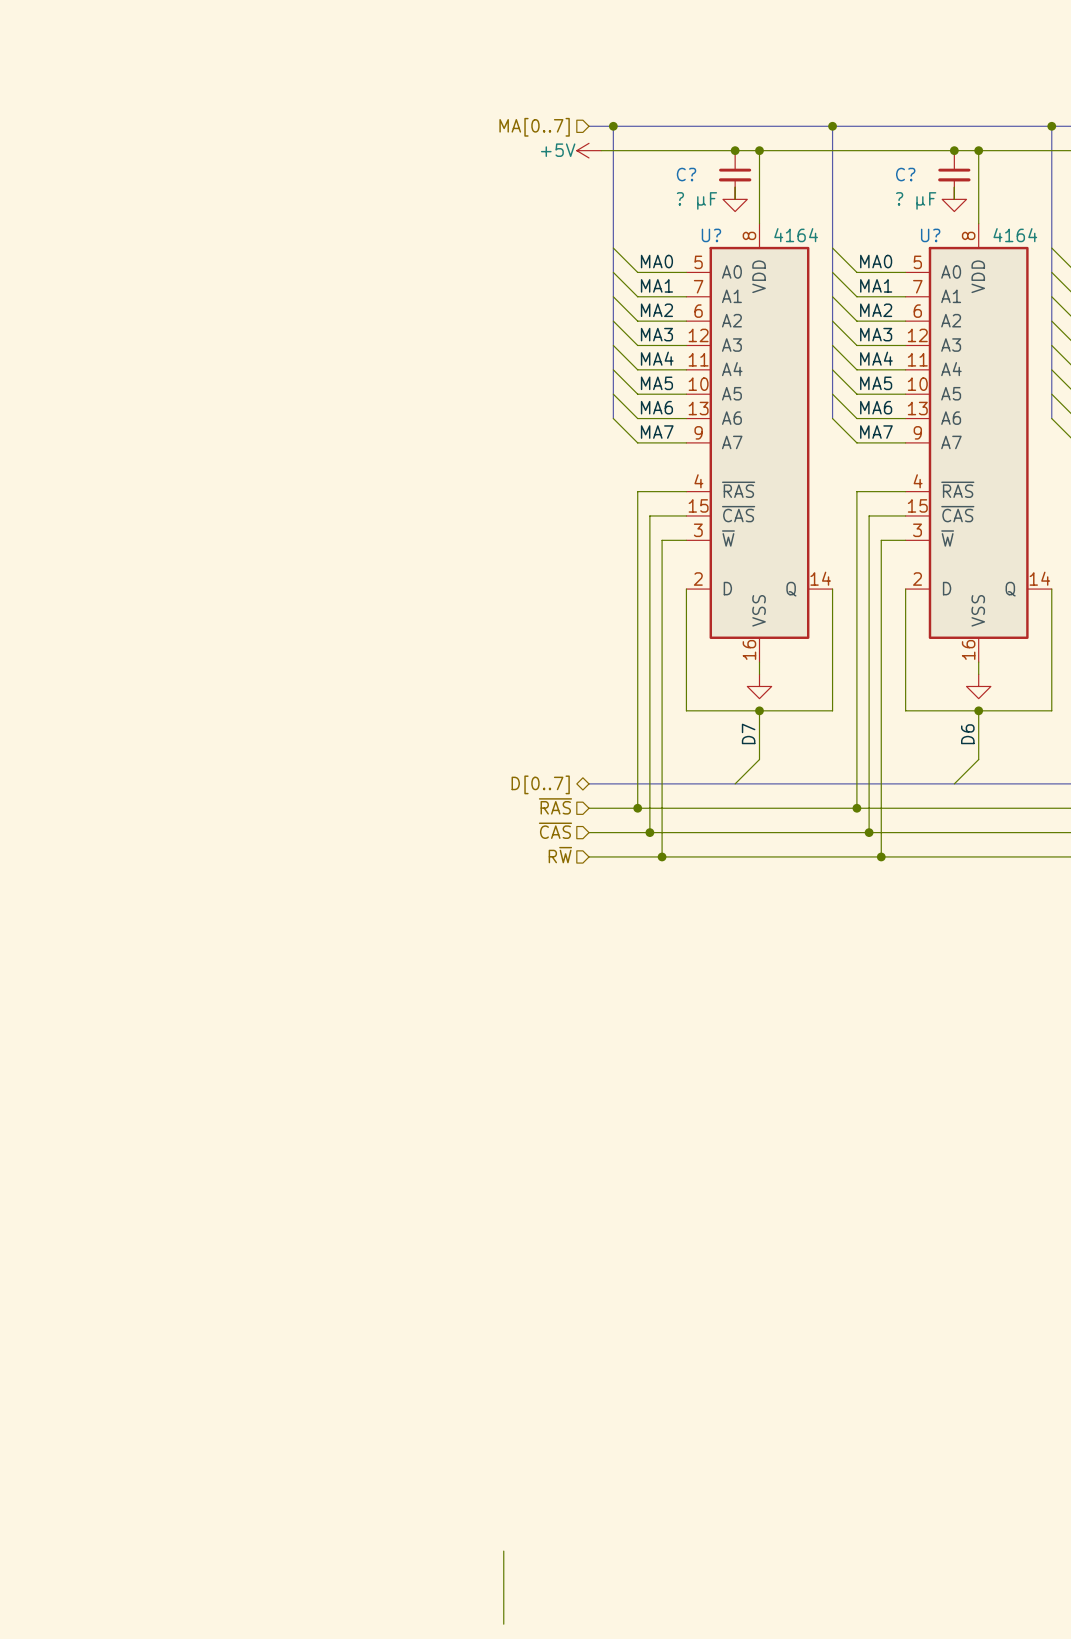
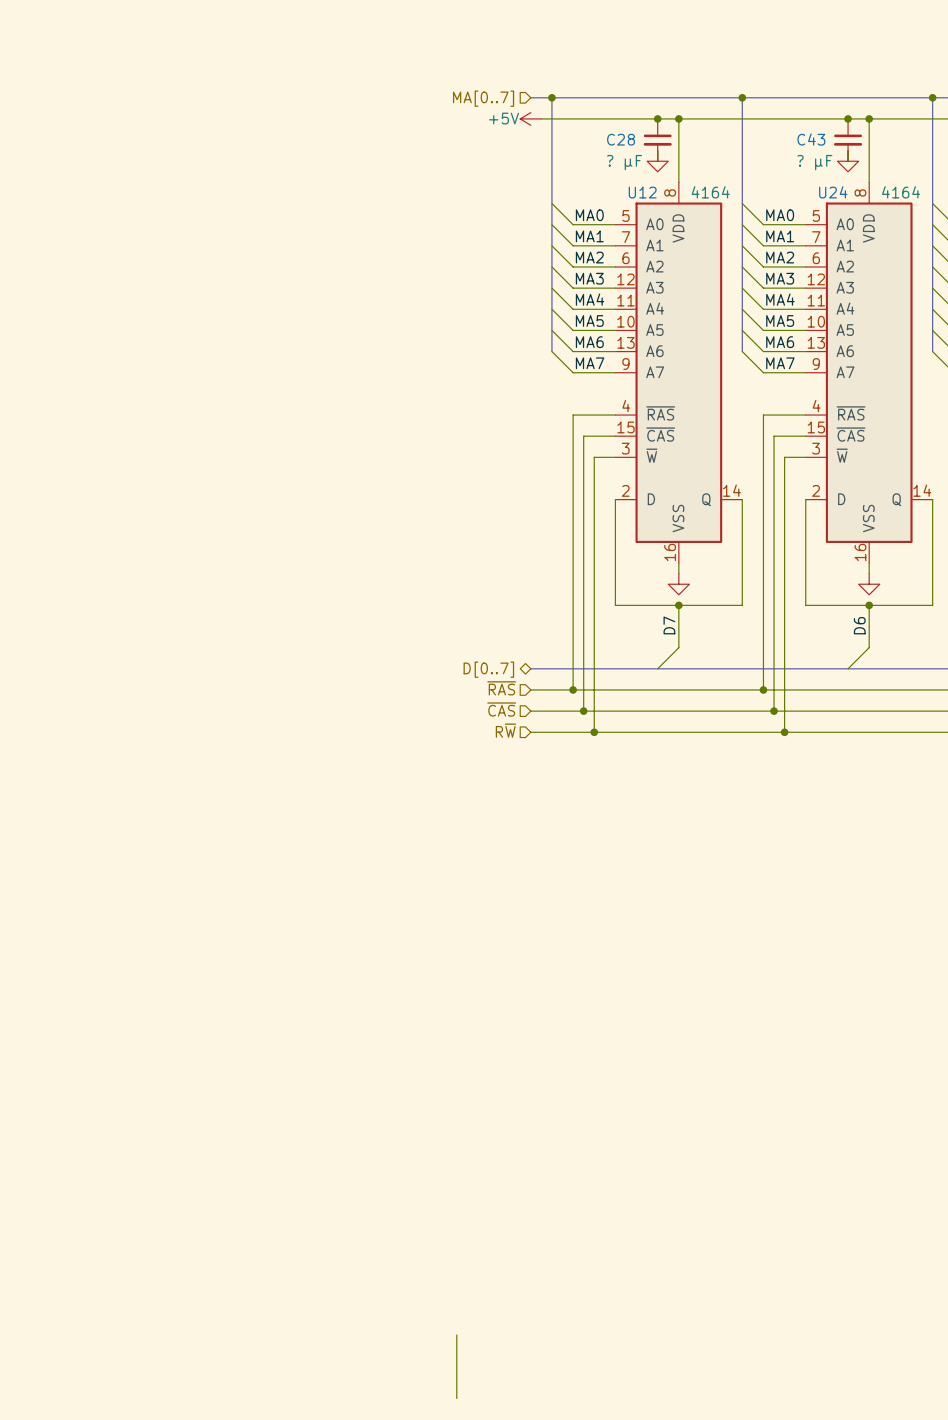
C? name: C? (686, 174) -> C28 (621, 139)
C? name: C? (905, 174) -> C43 (811, 139)
U? name: U? (711, 235) -> U12 (642, 192)
U? name: U? (930, 235) -> U24 (833, 192)

